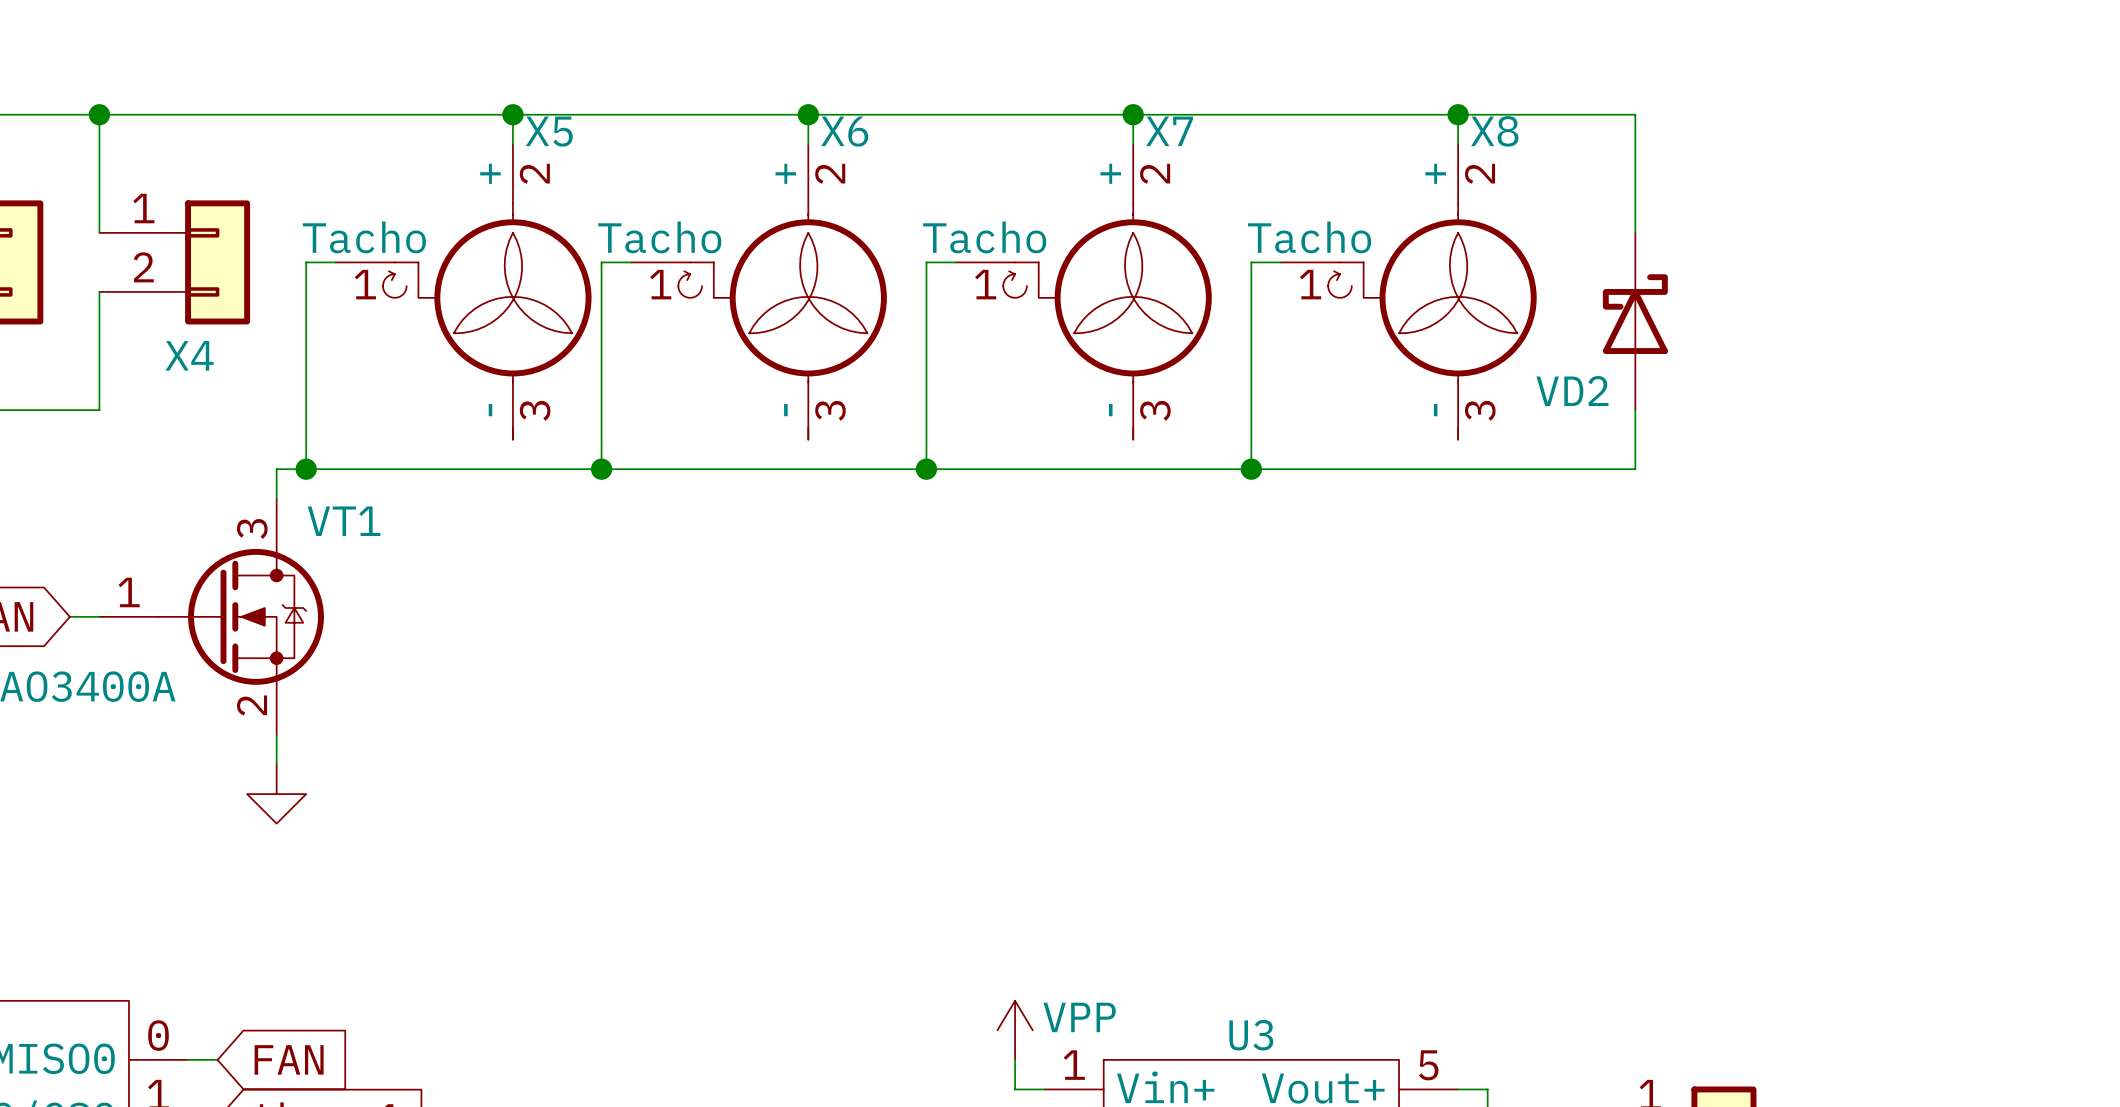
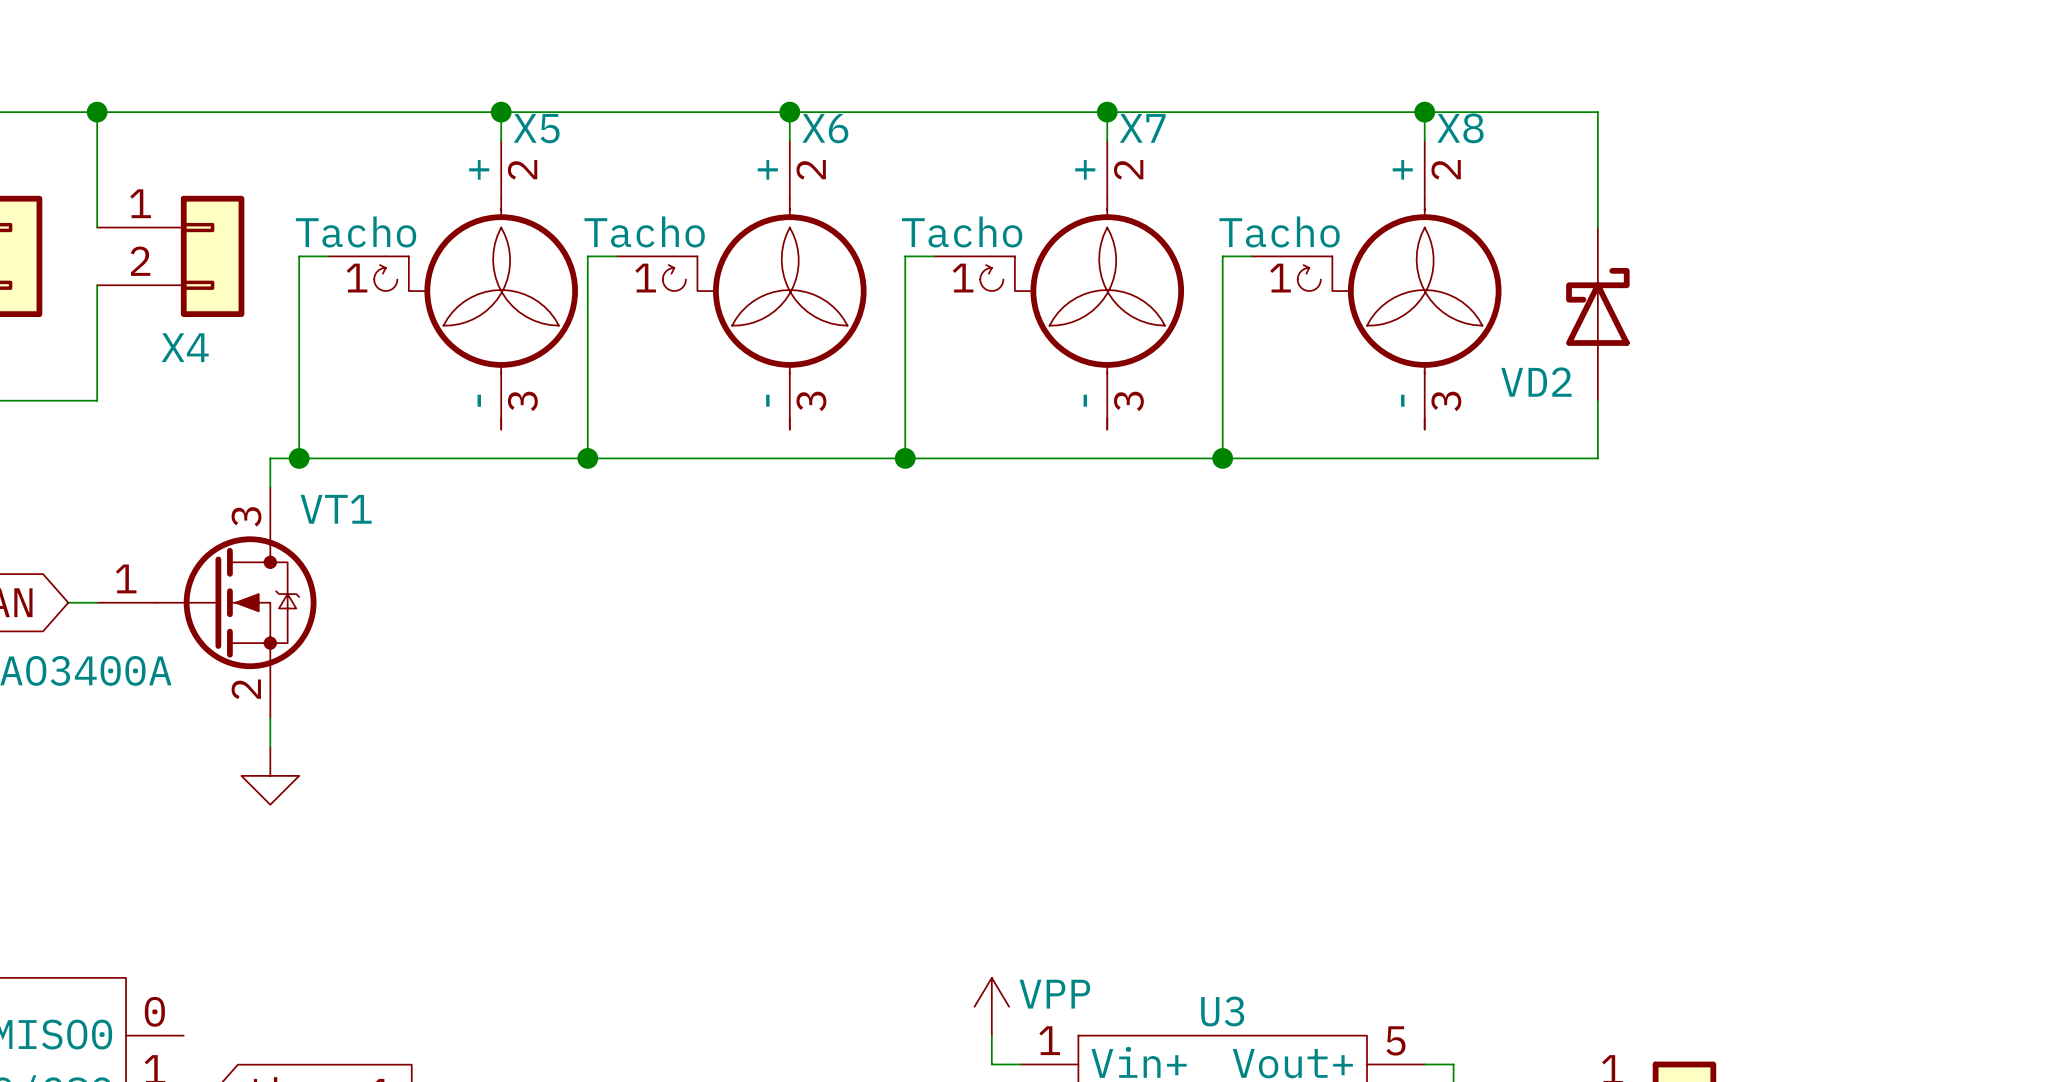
wire: (188, 1059) (217, 1059) -> none
global label: FAN (289, 1059) -> none

